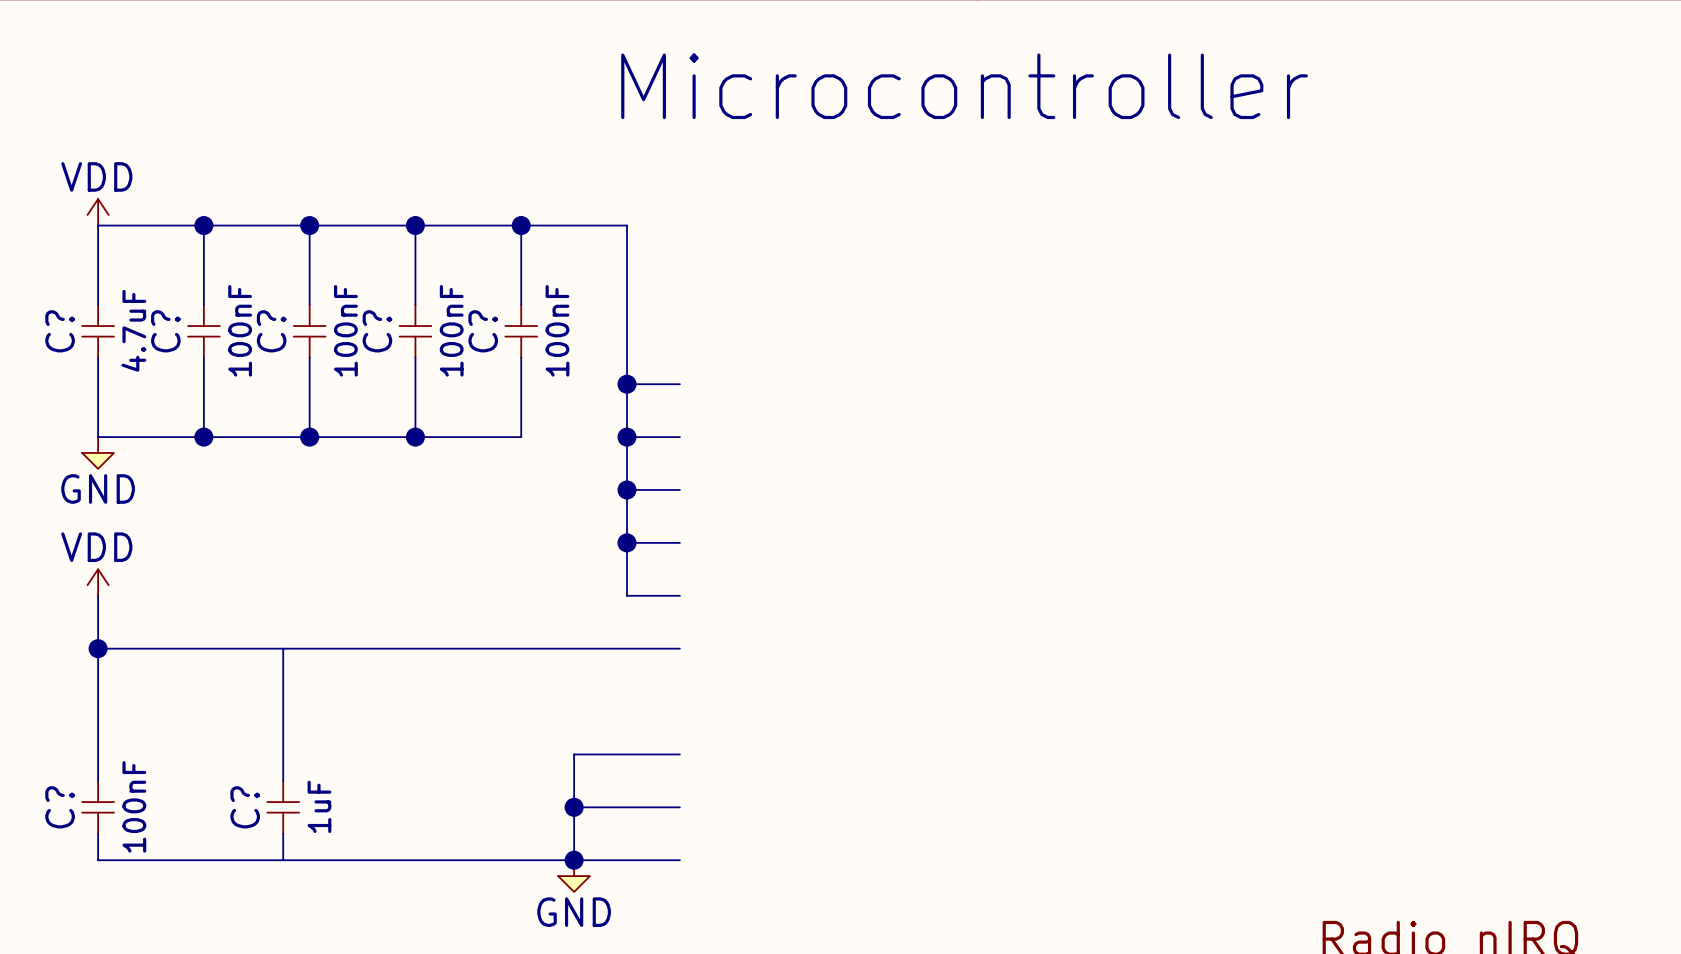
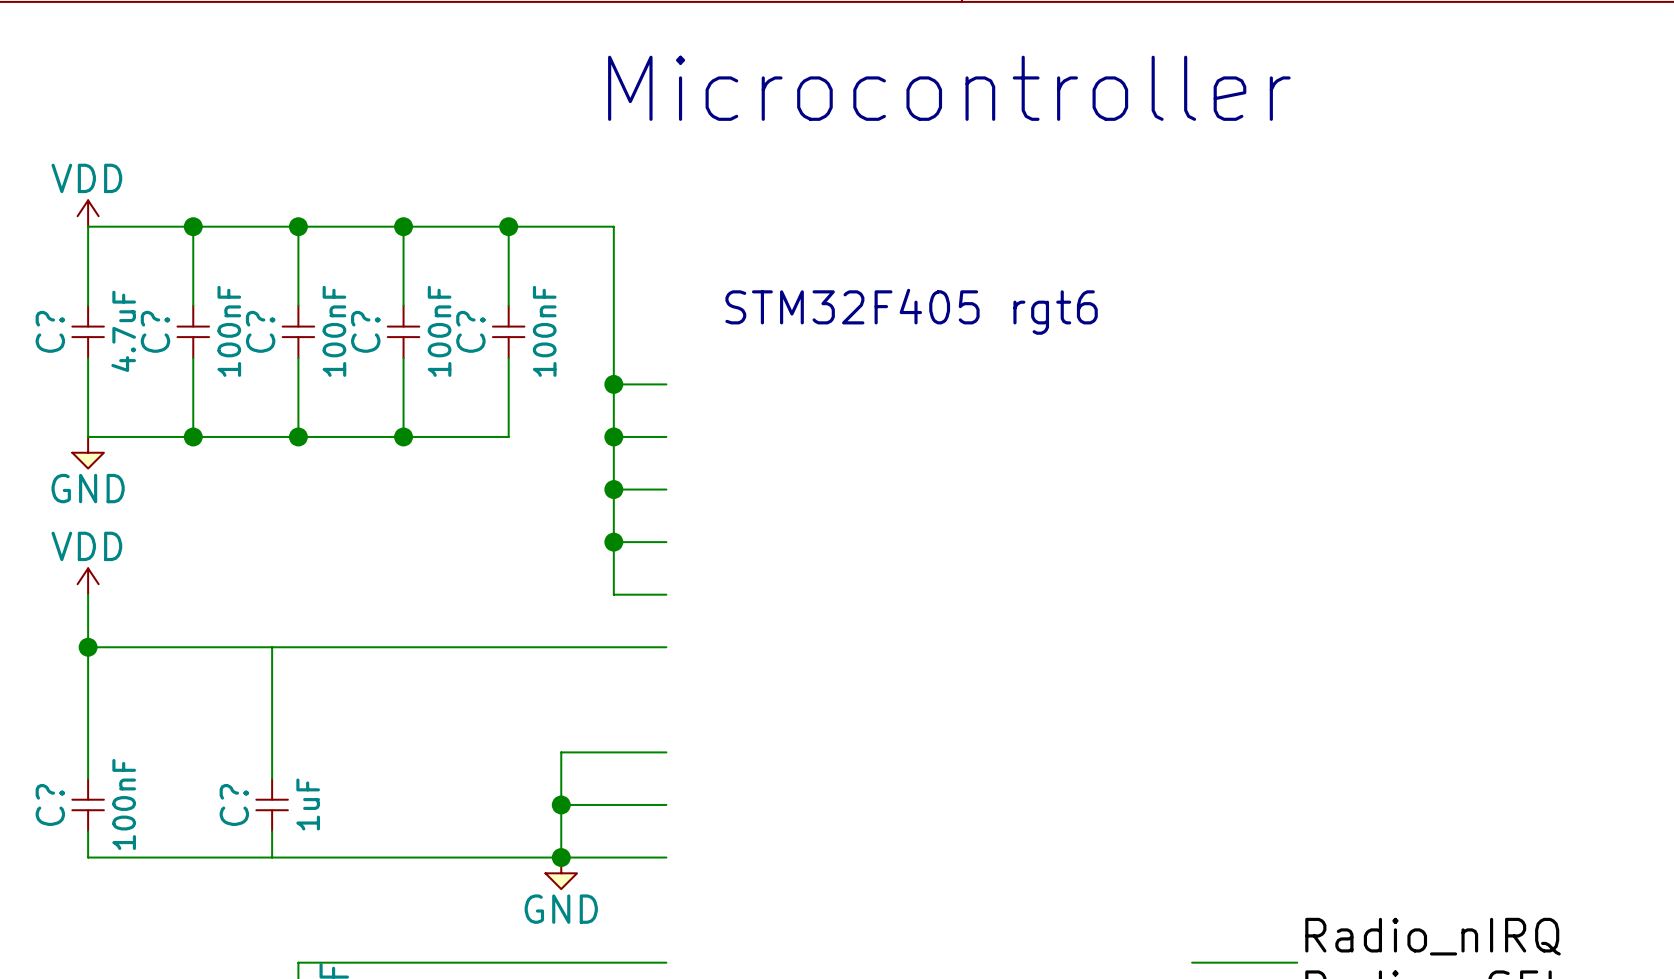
text: none -> STM32F405 rgt6 (911, 311)

